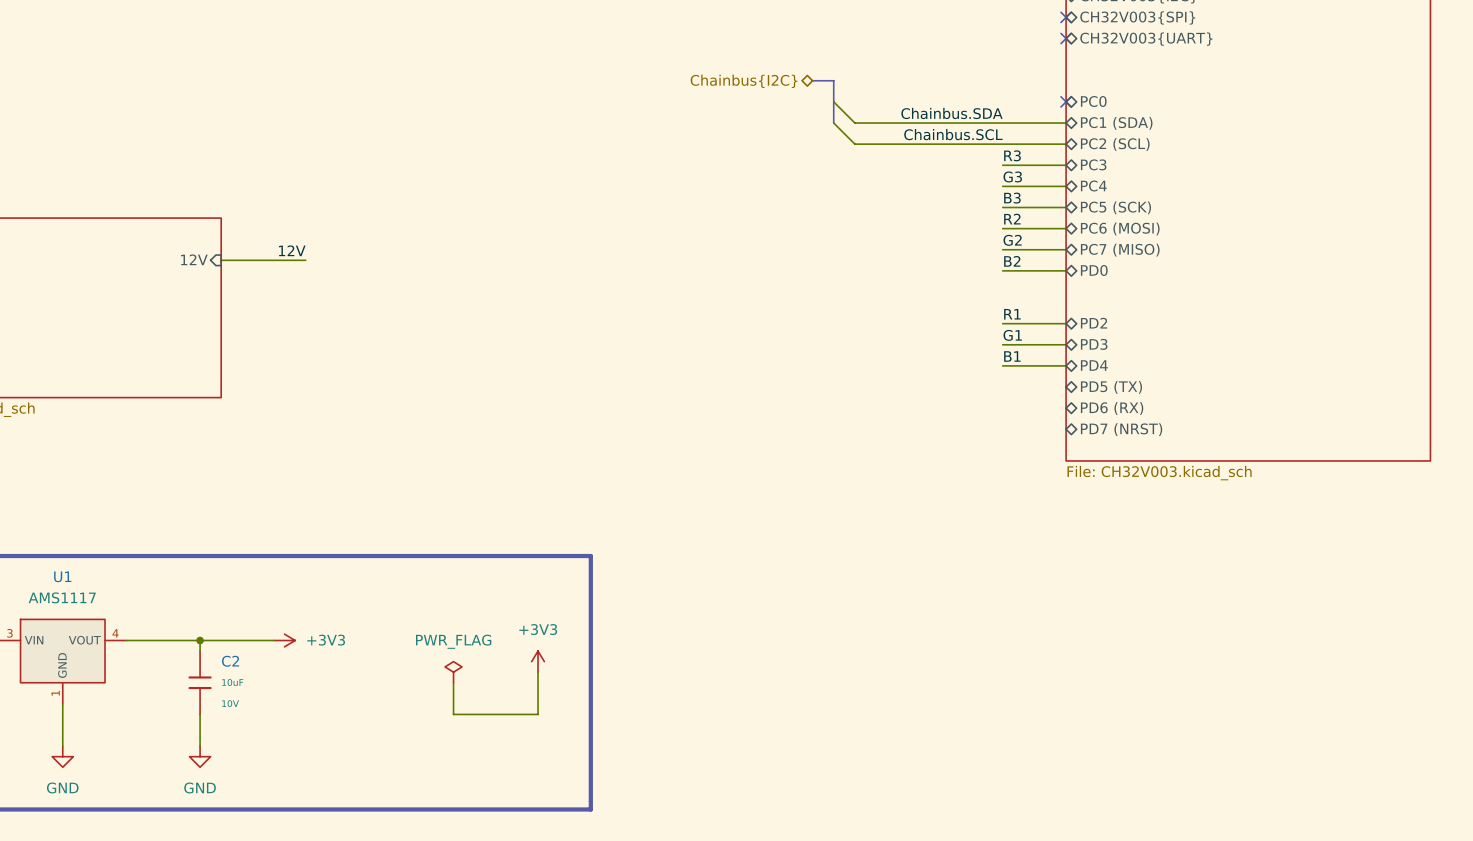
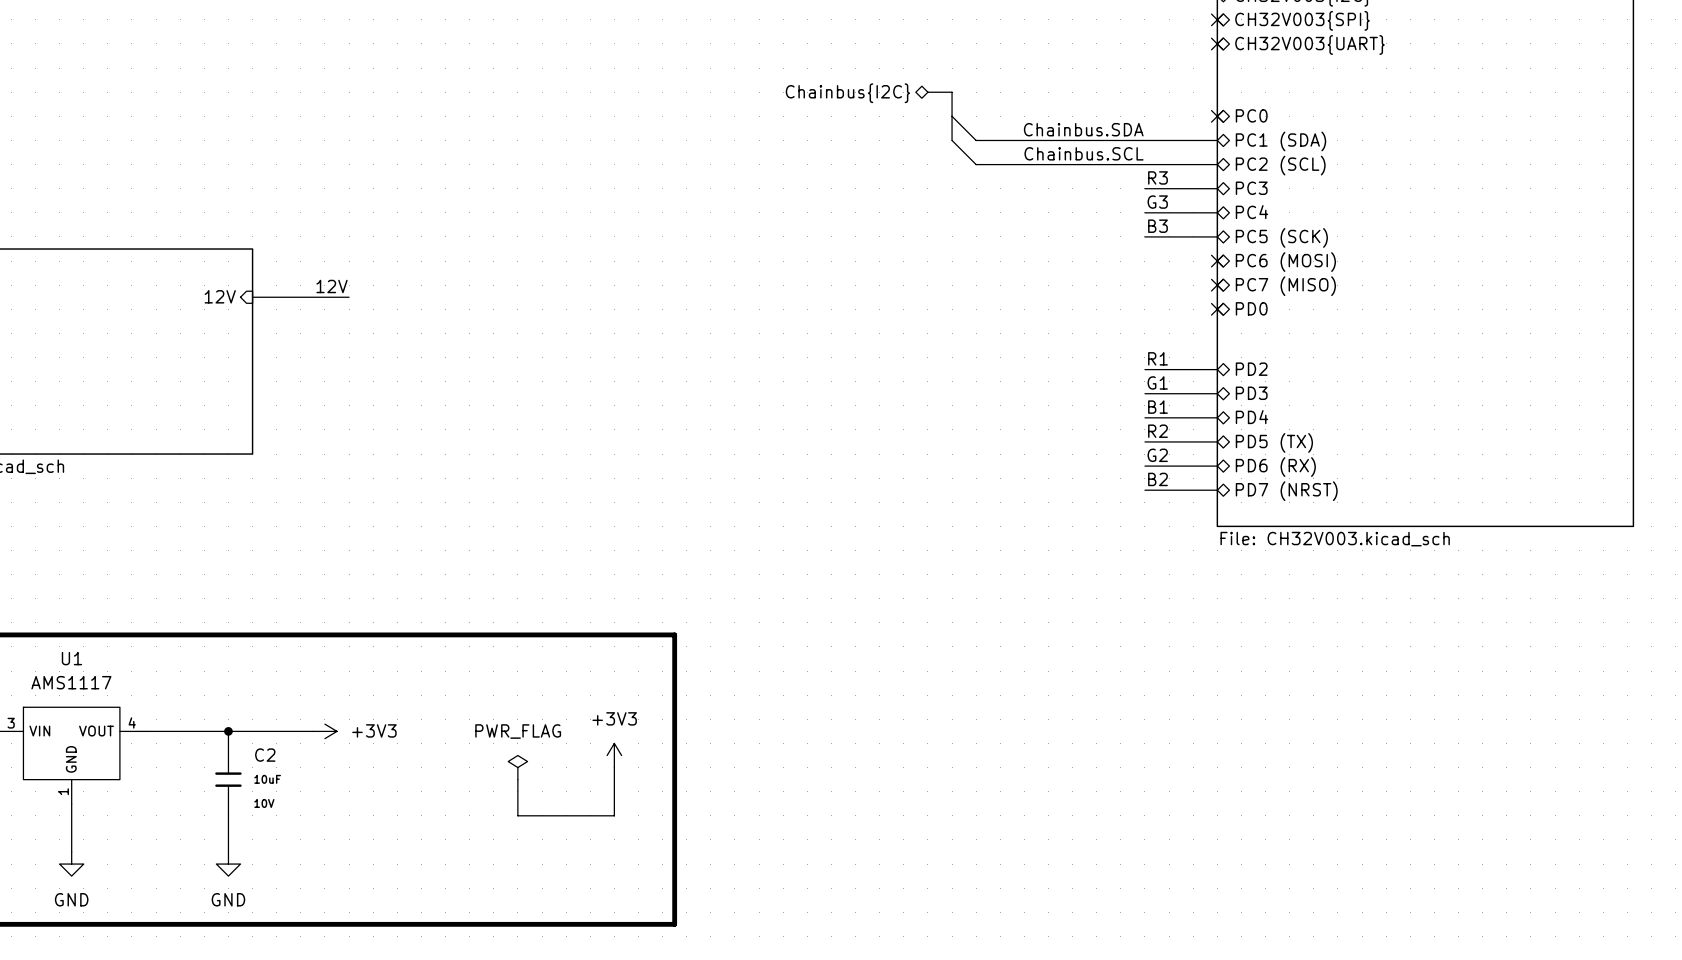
label position: R2 (1012, 219) -> R2 (1158, 431)
wire: (1002, 228) (1066, 228) -> (1144, 490) (1217, 490)
no-connect mark: none -> (1217, 261)
label position: G2 (1012, 240) -> G2 (1157, 455)
wire: (1002, 249) (1066, 249) -> (1144, 466) (1217, 466)
no-connect mark: none -> (1217, 285)
label position: B2 (1012, 261) -> B2 (1158, 479)
wire: (1002, 270) (1066, 270) -> (1144, 441) (1217, 441)
no-connect mark: none -> (1217, 309)

